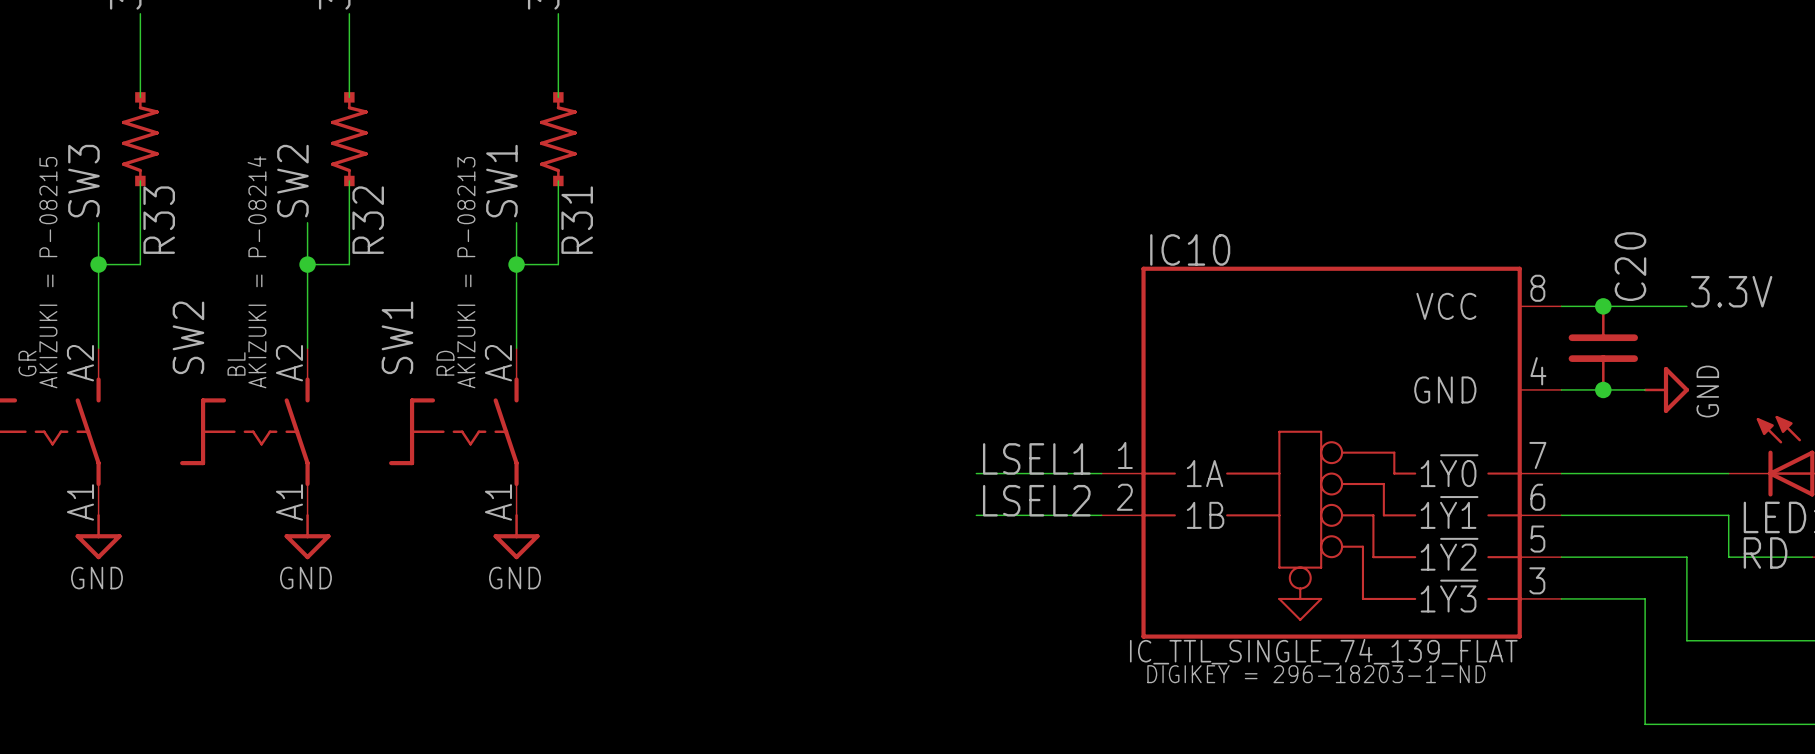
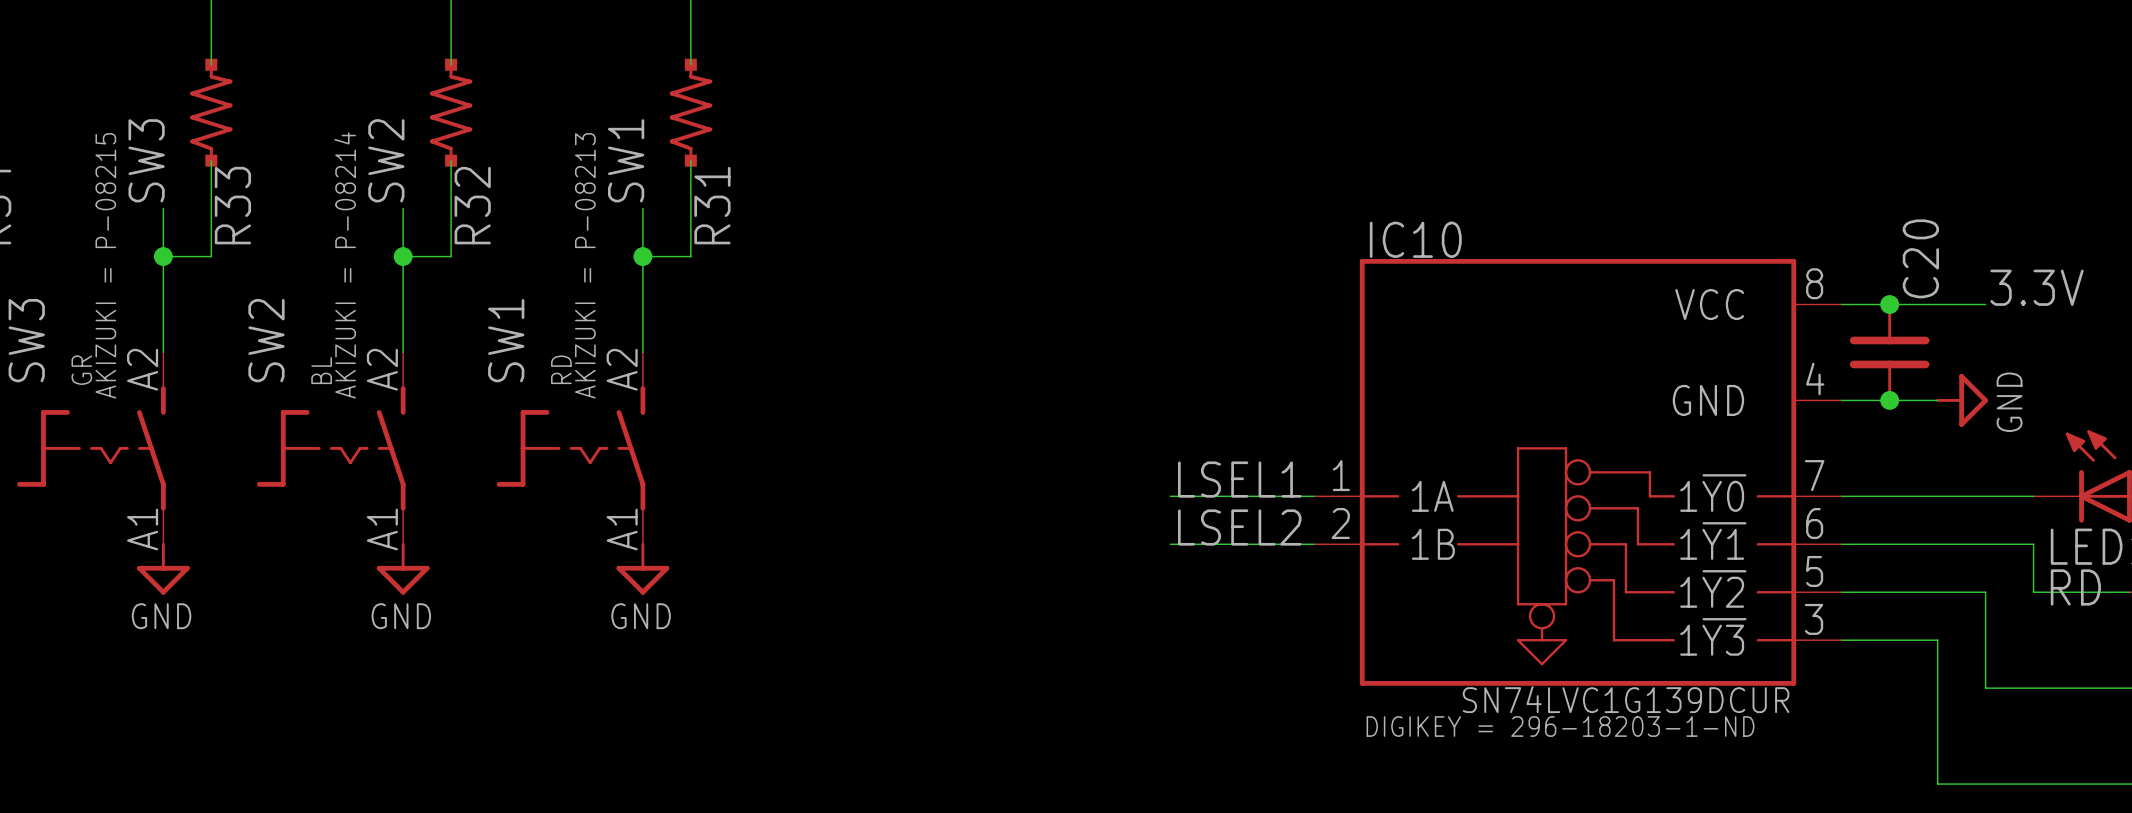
IC10 value: IC_TTL_SINGLE_74_139_FLAT (1323, 651) -> SN74LVC1G139DCUR (1626, 699)

